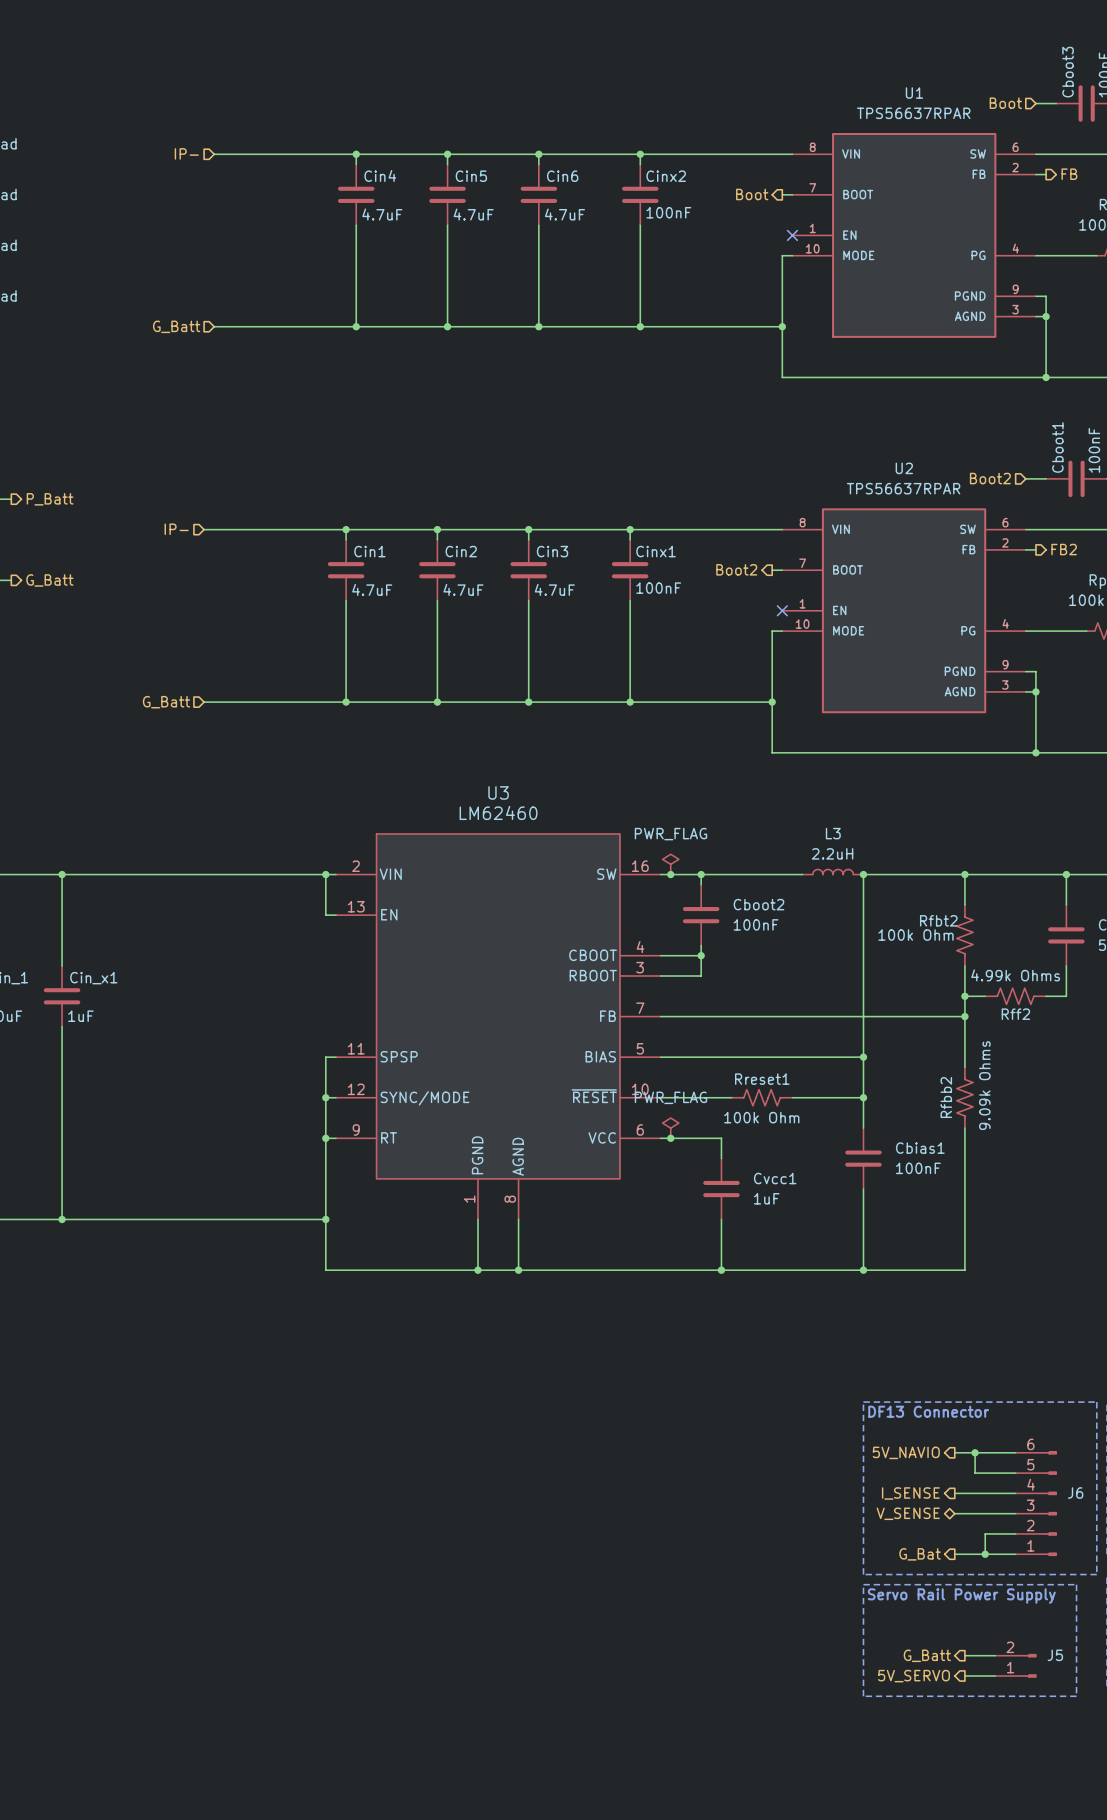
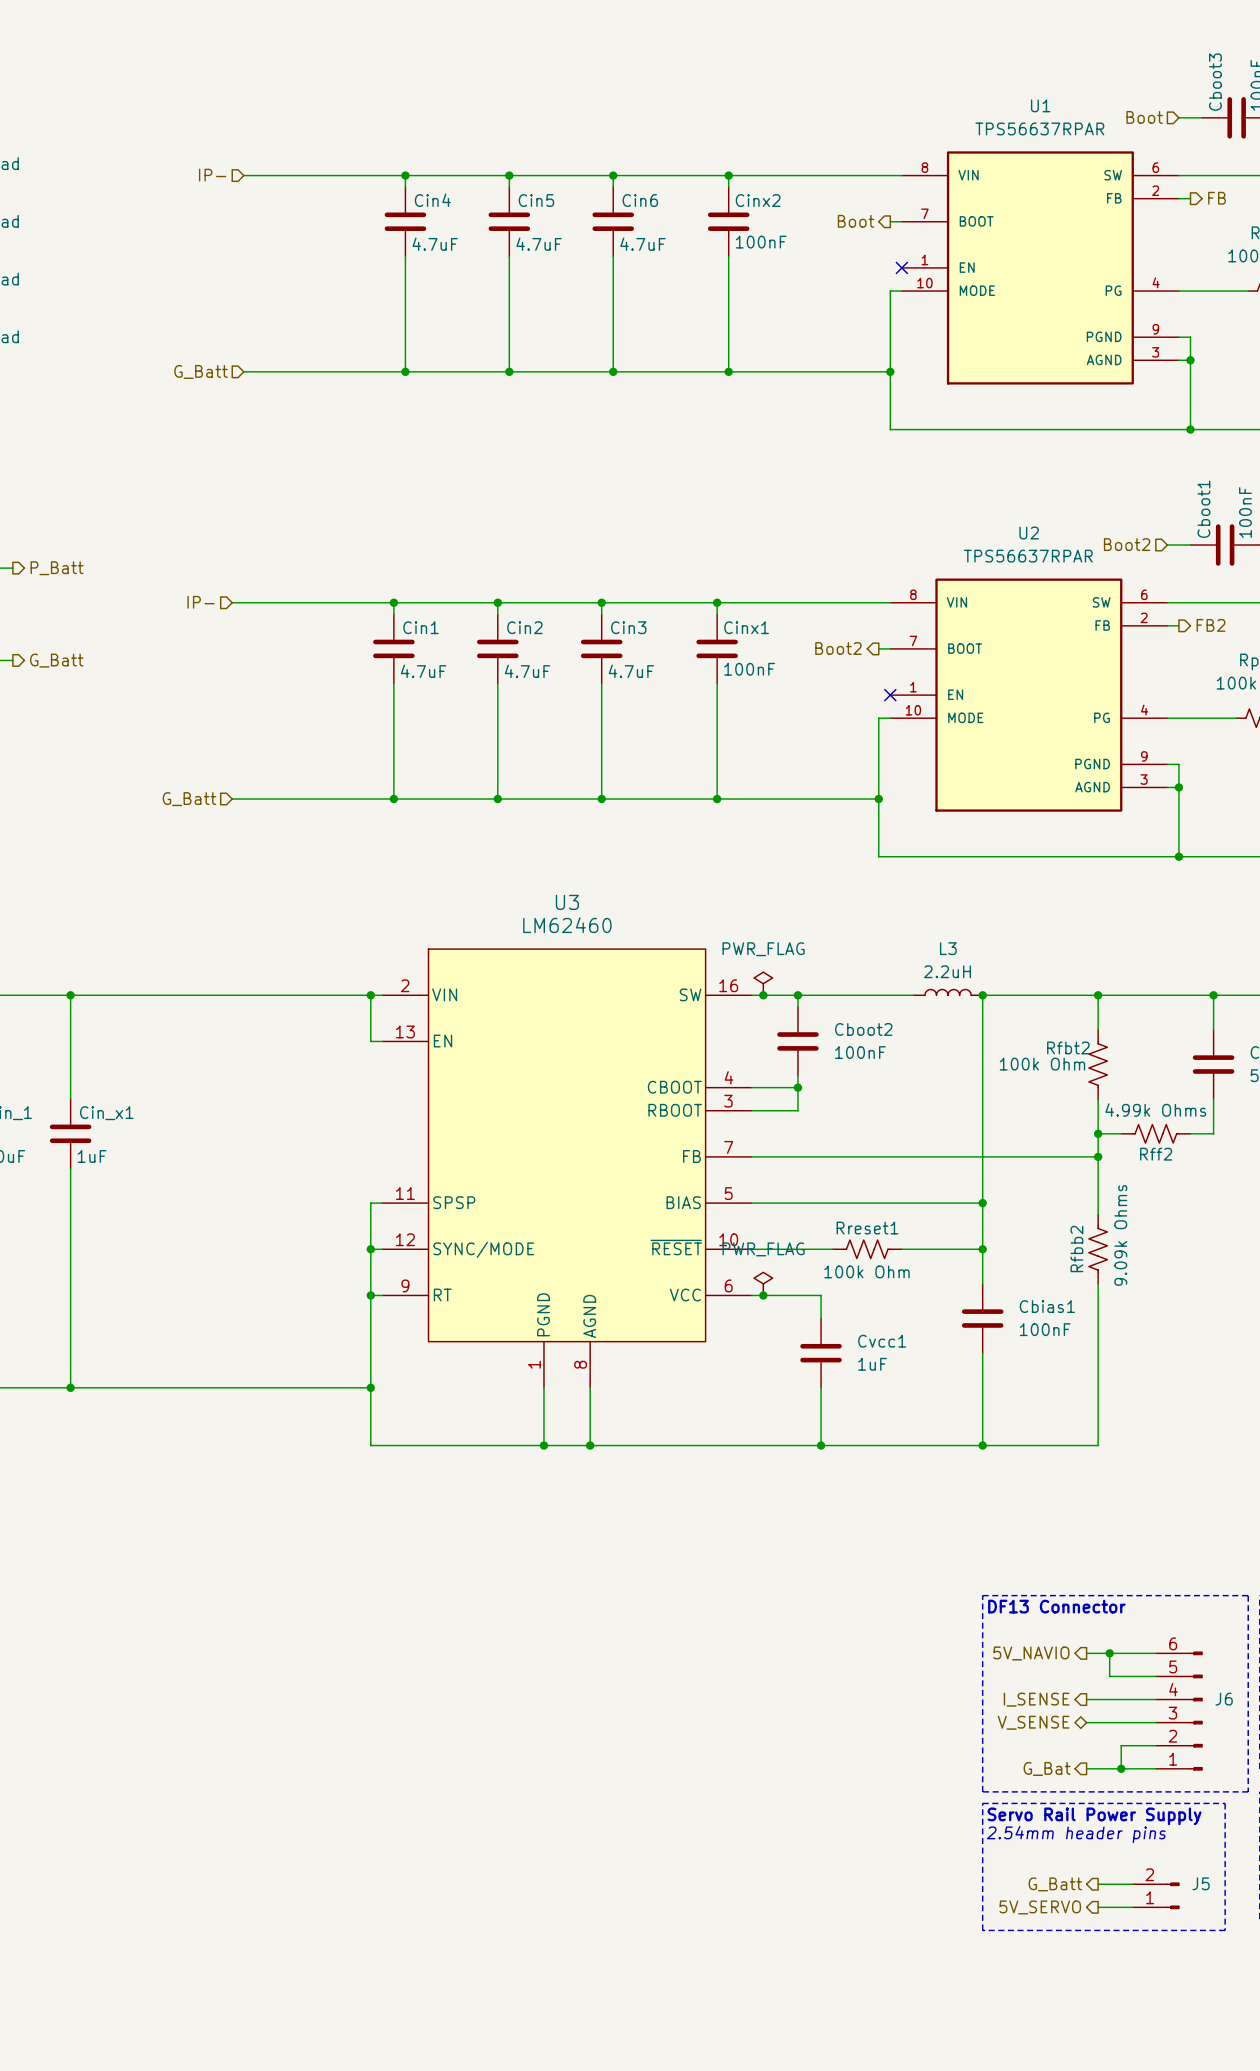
text: none -> 2.54mm header pins (1076, 1834)

